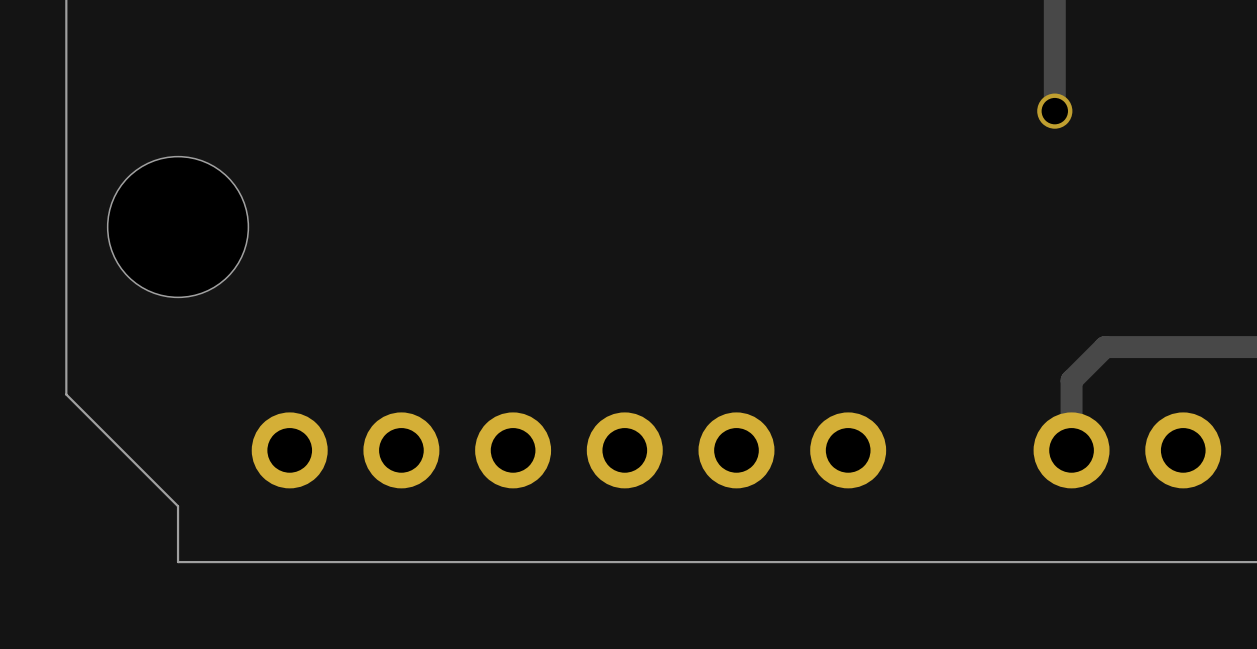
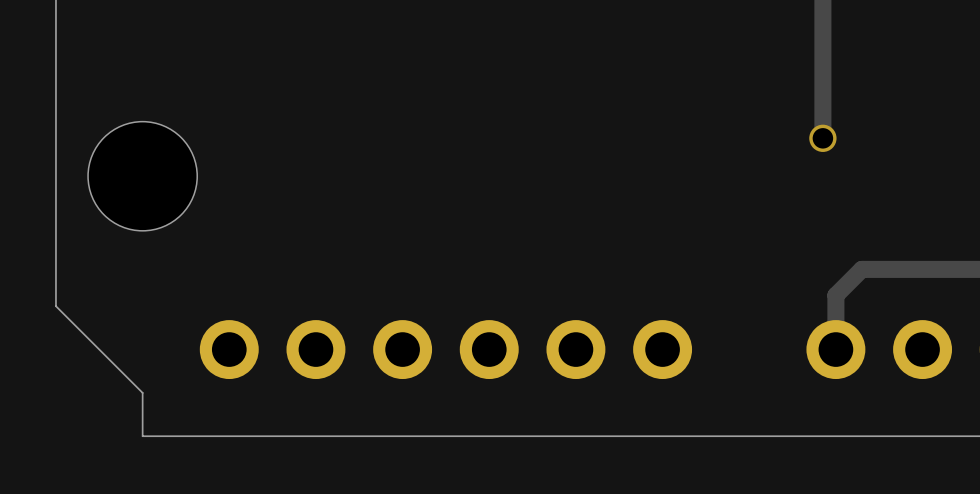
track: none -> (822, 86) (822, 138)
via position: (1054, 111) -> (822, 138)

